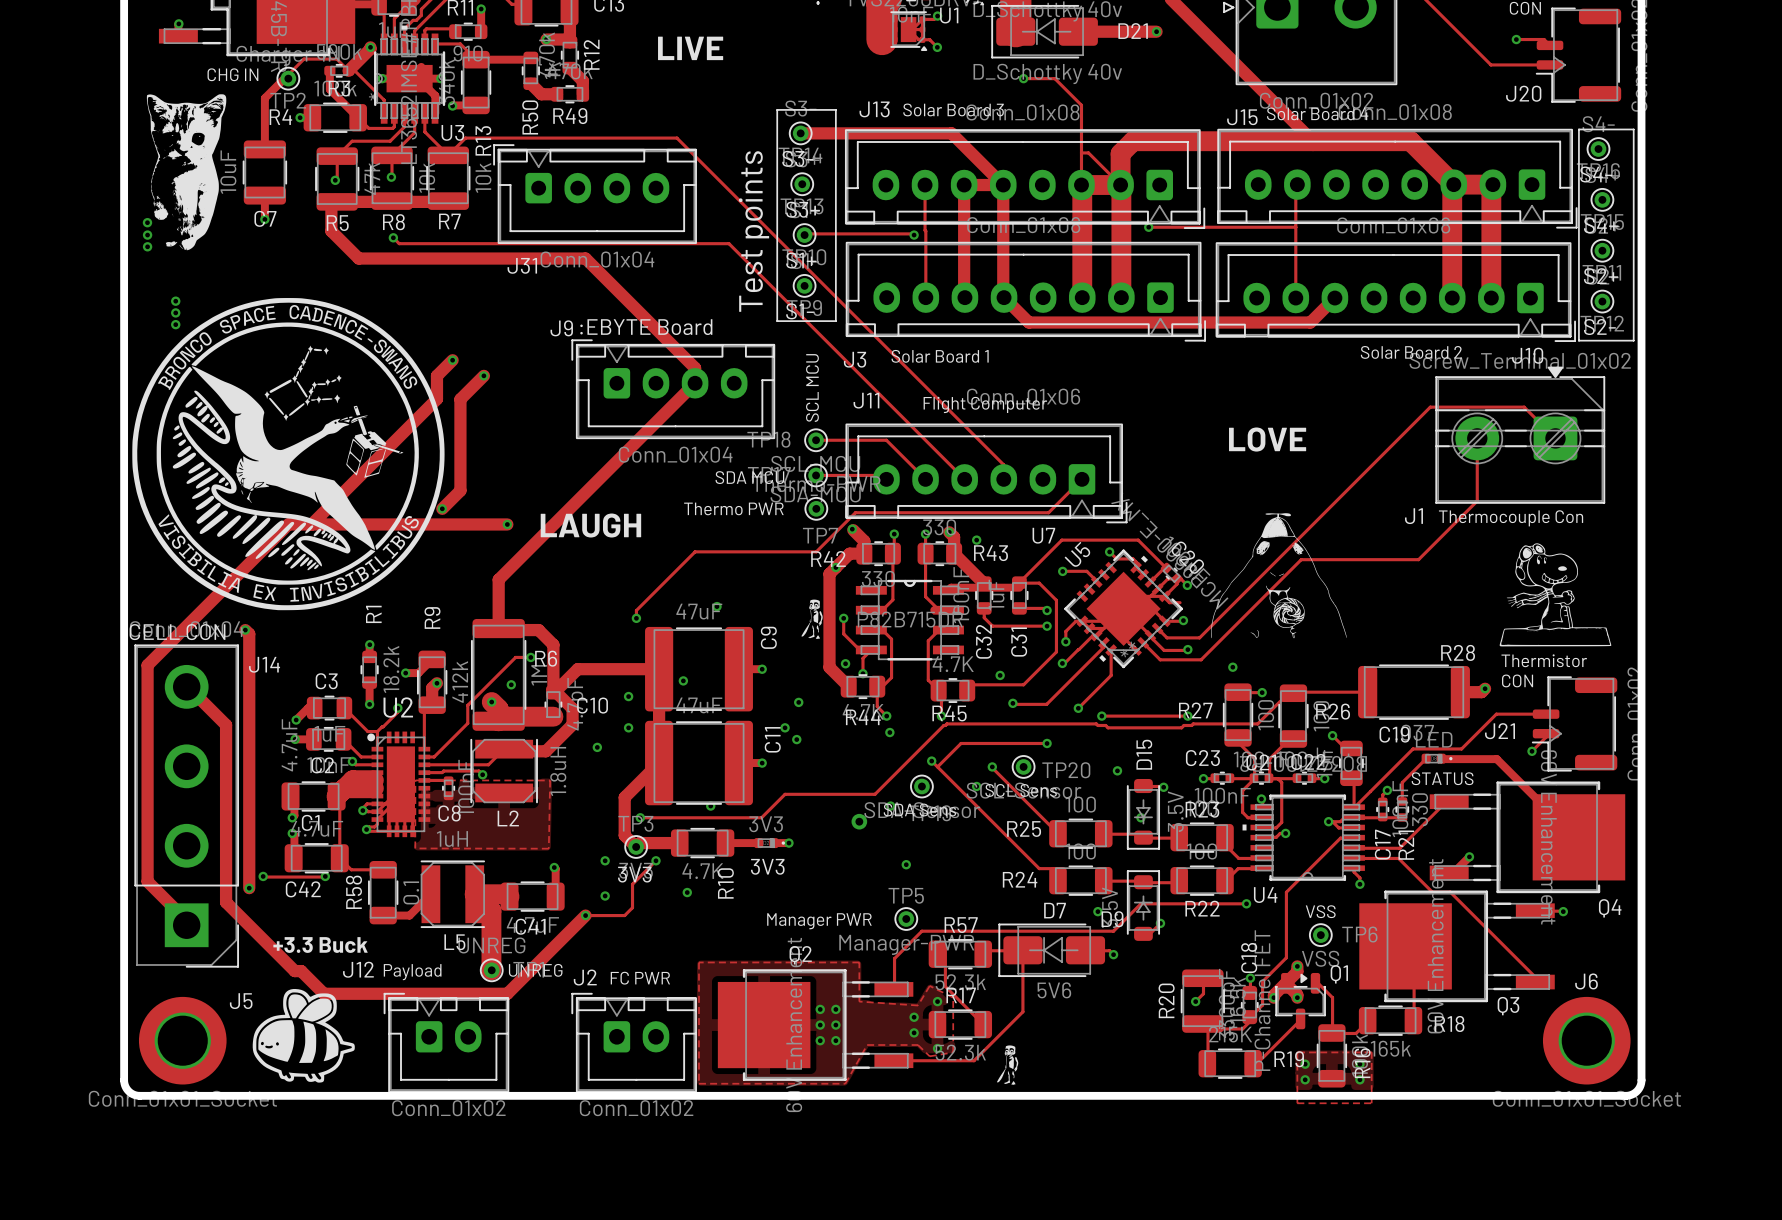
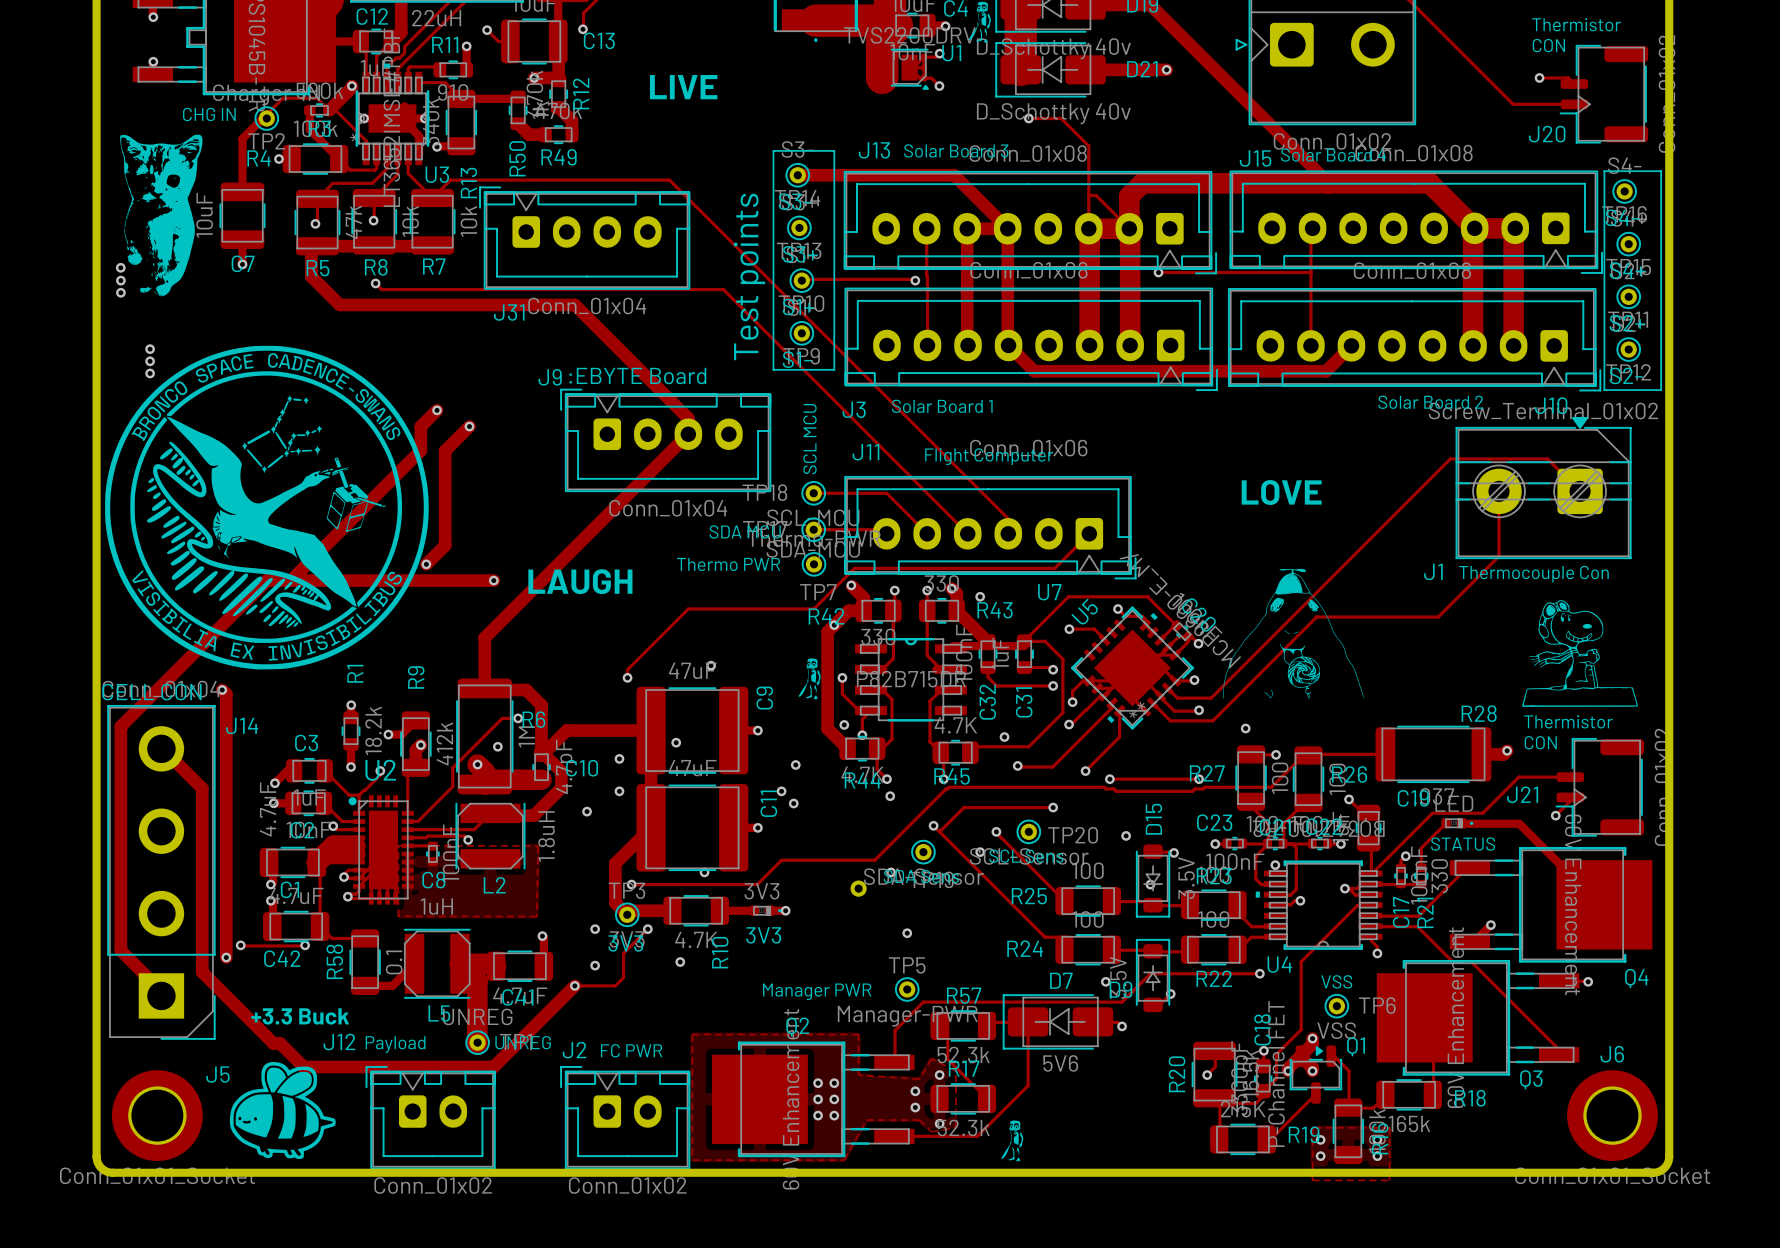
track: (1164, 598) (1169, 602) (1180, 602) -> none

